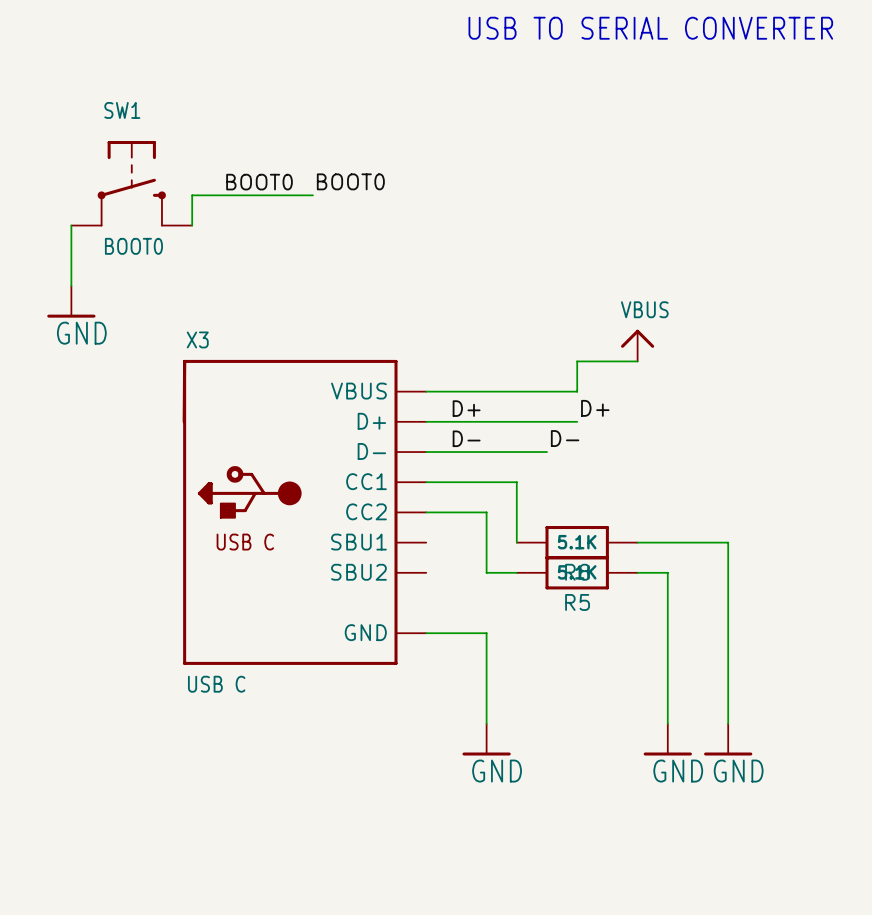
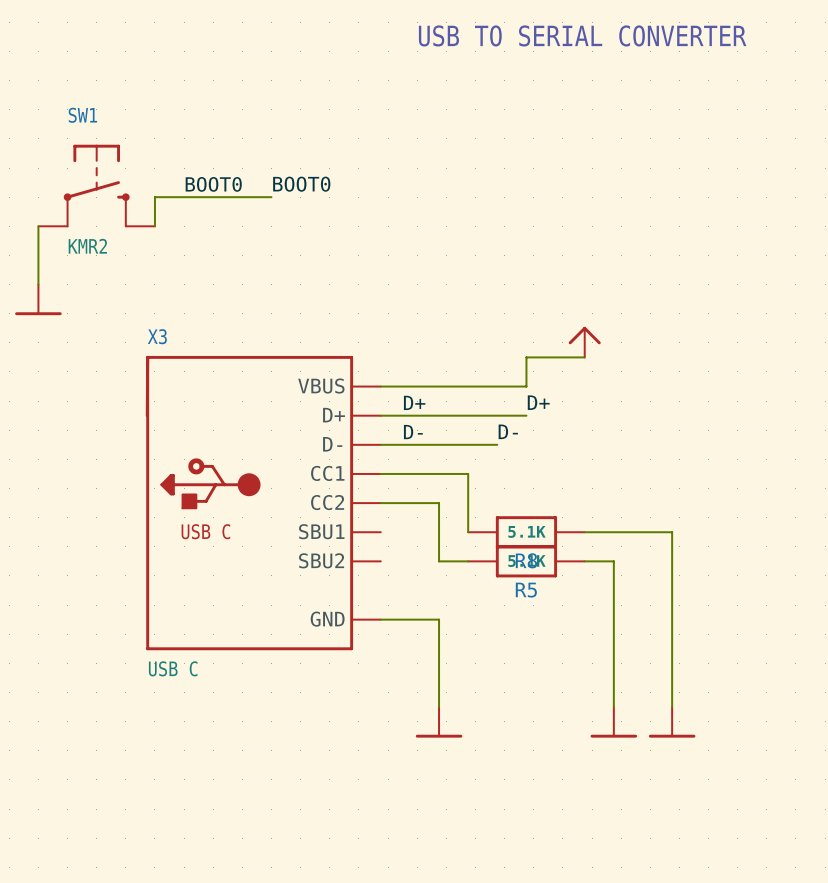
SW1 value: BOOT0 (133, 246) -> KMR2 (87, 246)
power symbol text: VBUS (644, 309) -> none
power symbol text: GND (81, 333) -> none
power symbol text: GND (497, 771) -> none
power symbol text: GND (678, 771) -> none
power symbol text: GND (738, 771) -> none

